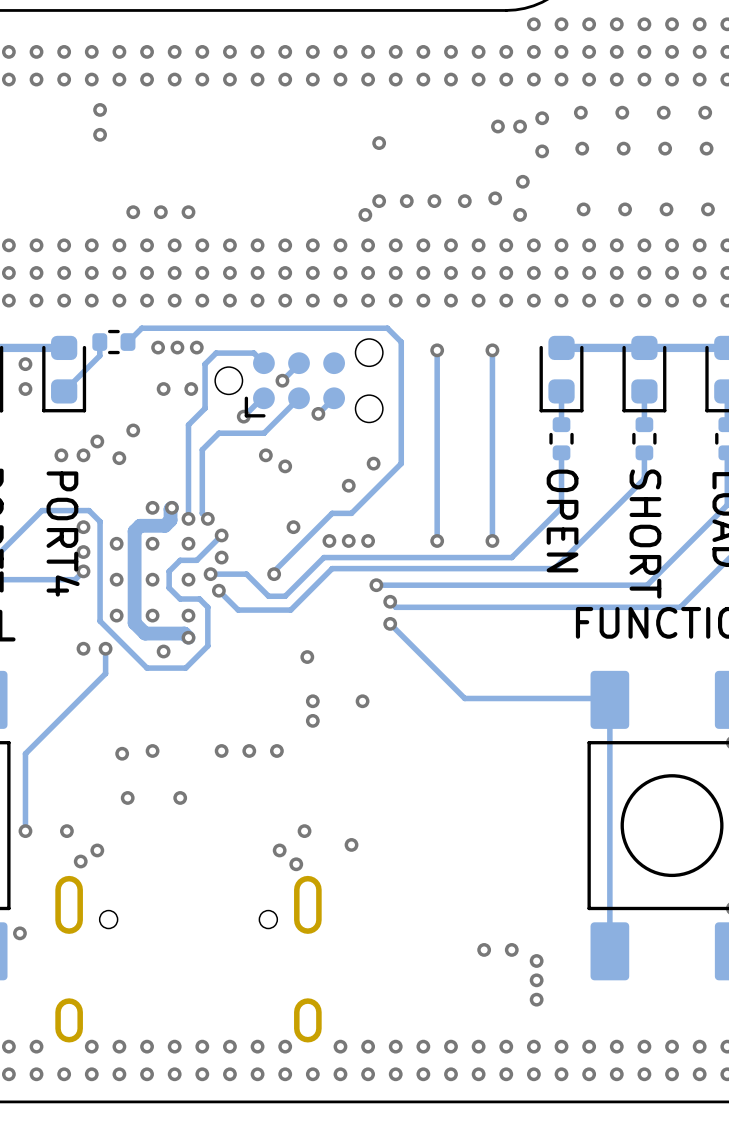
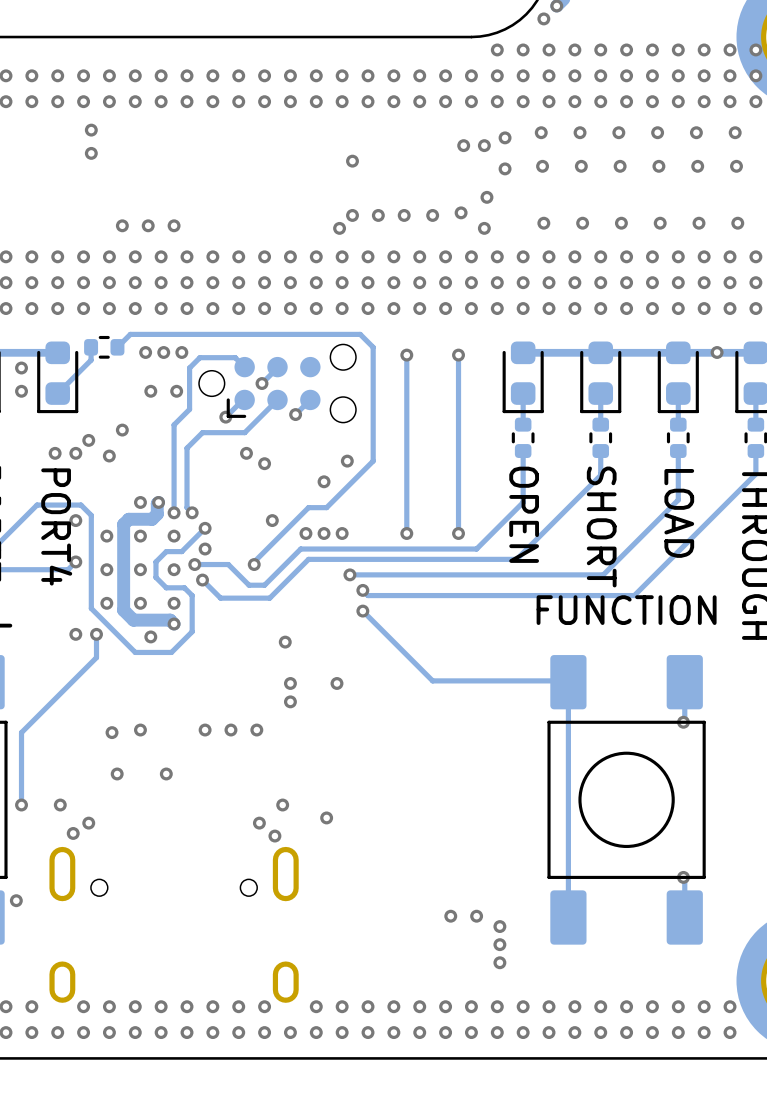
via: (83, 552) -> none

